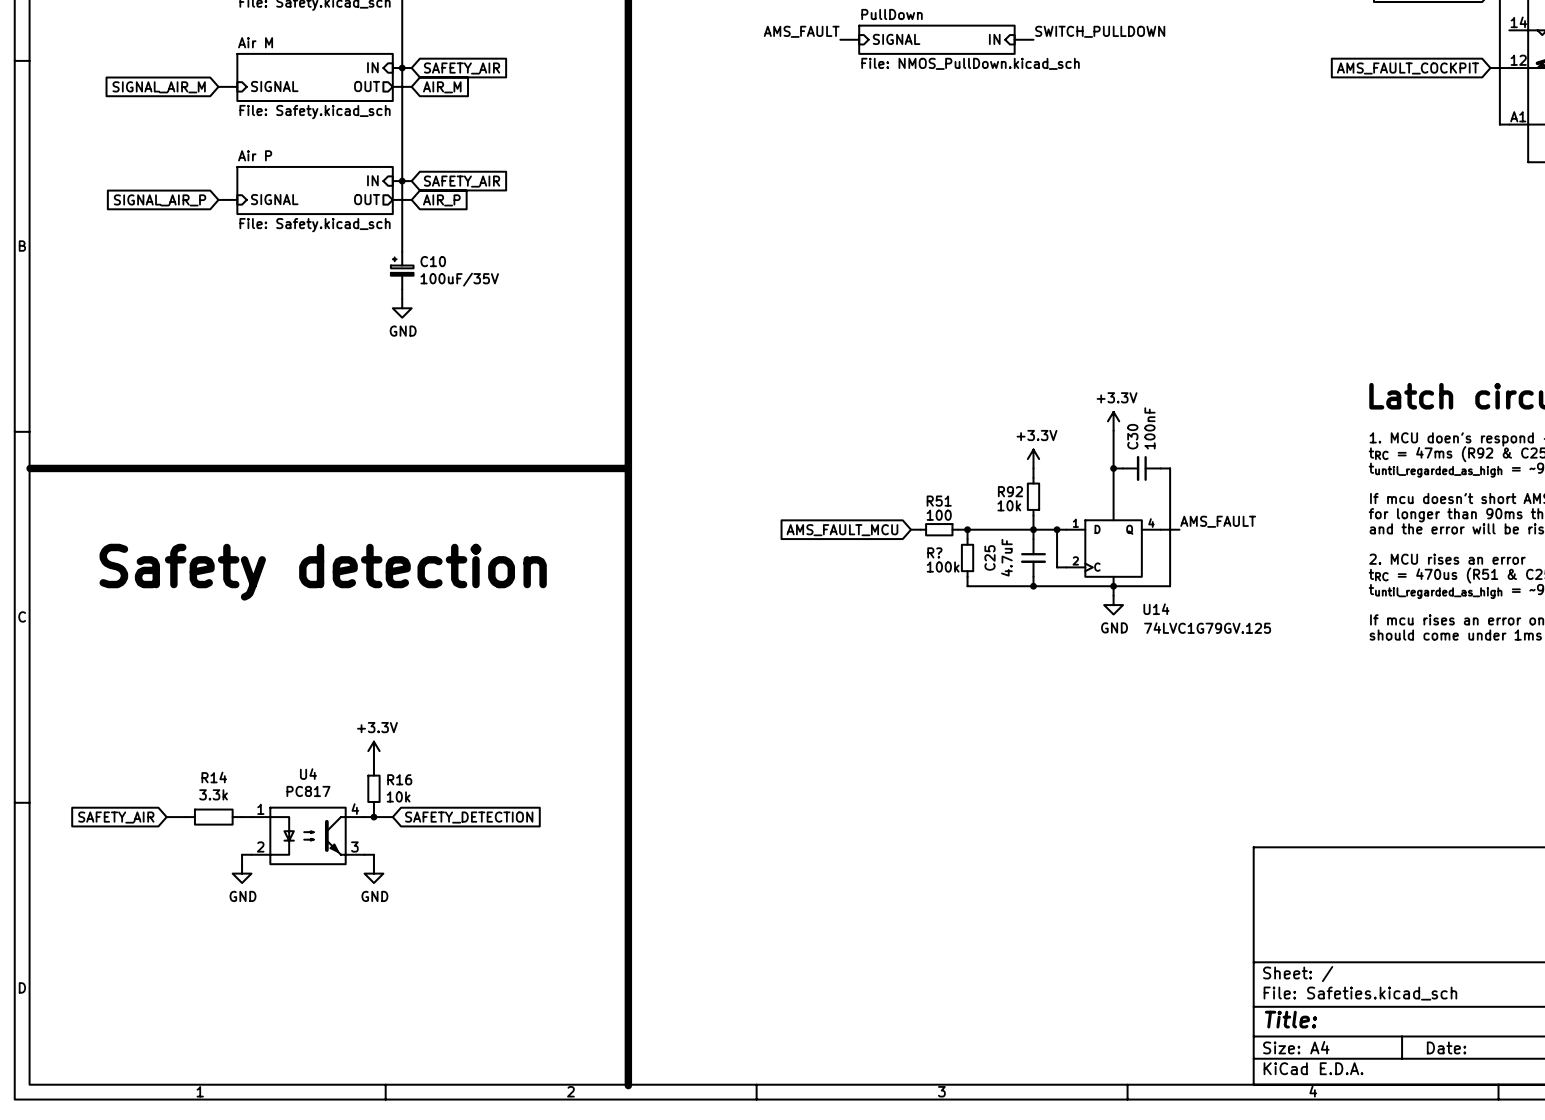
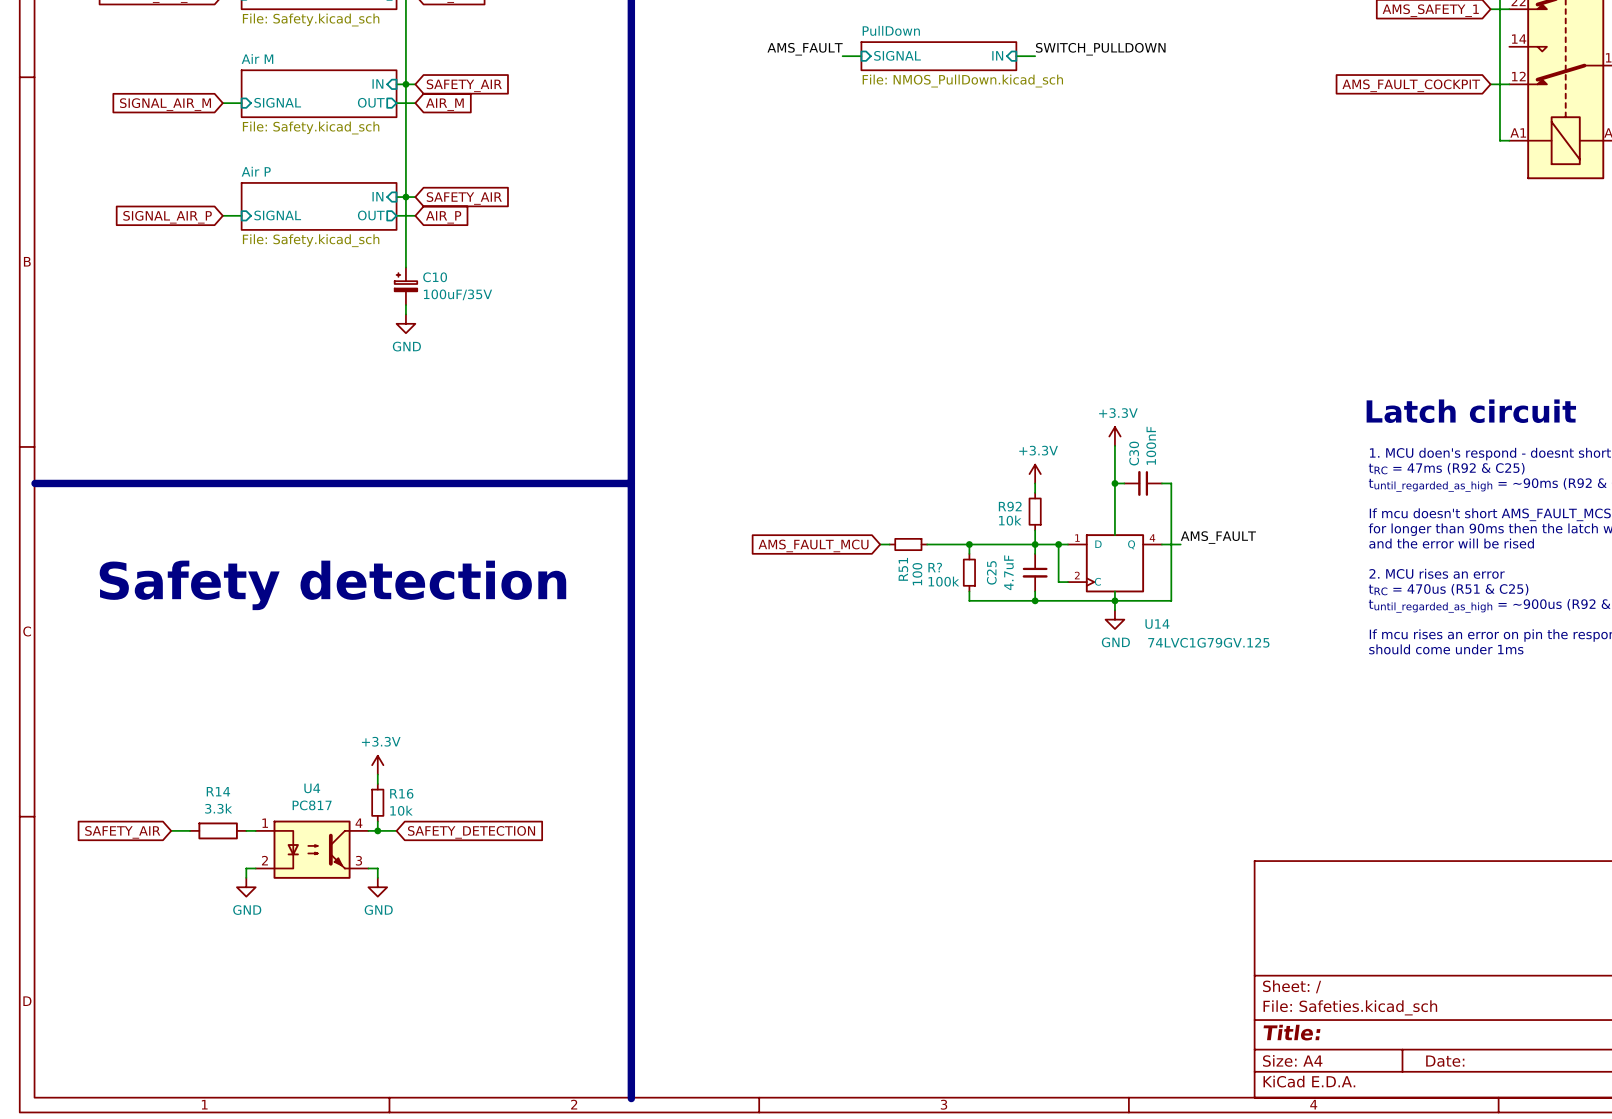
R51 name rotation: 0° (939, 501) -> 90° counterclockwise (903, 569)
R51 name position: R51 (939, 501) -> R51 (903, 569)
R51 value rotation: 0° (939, 515) -> 90° counterclockwise (917, 574)
R51 value position: 100 (939, 515) -> 100 (917, 574)
wire: (911, 529) (920, 529) -> (880, 544) (889, 544)
wire: none -> (927, 544) (960, 544)
R51 position: (939, 529) -> (908, 544)
global label position: AMS_FAULT_MCU (842, 530) -> AMS_FAULT_MCU (813, 545)

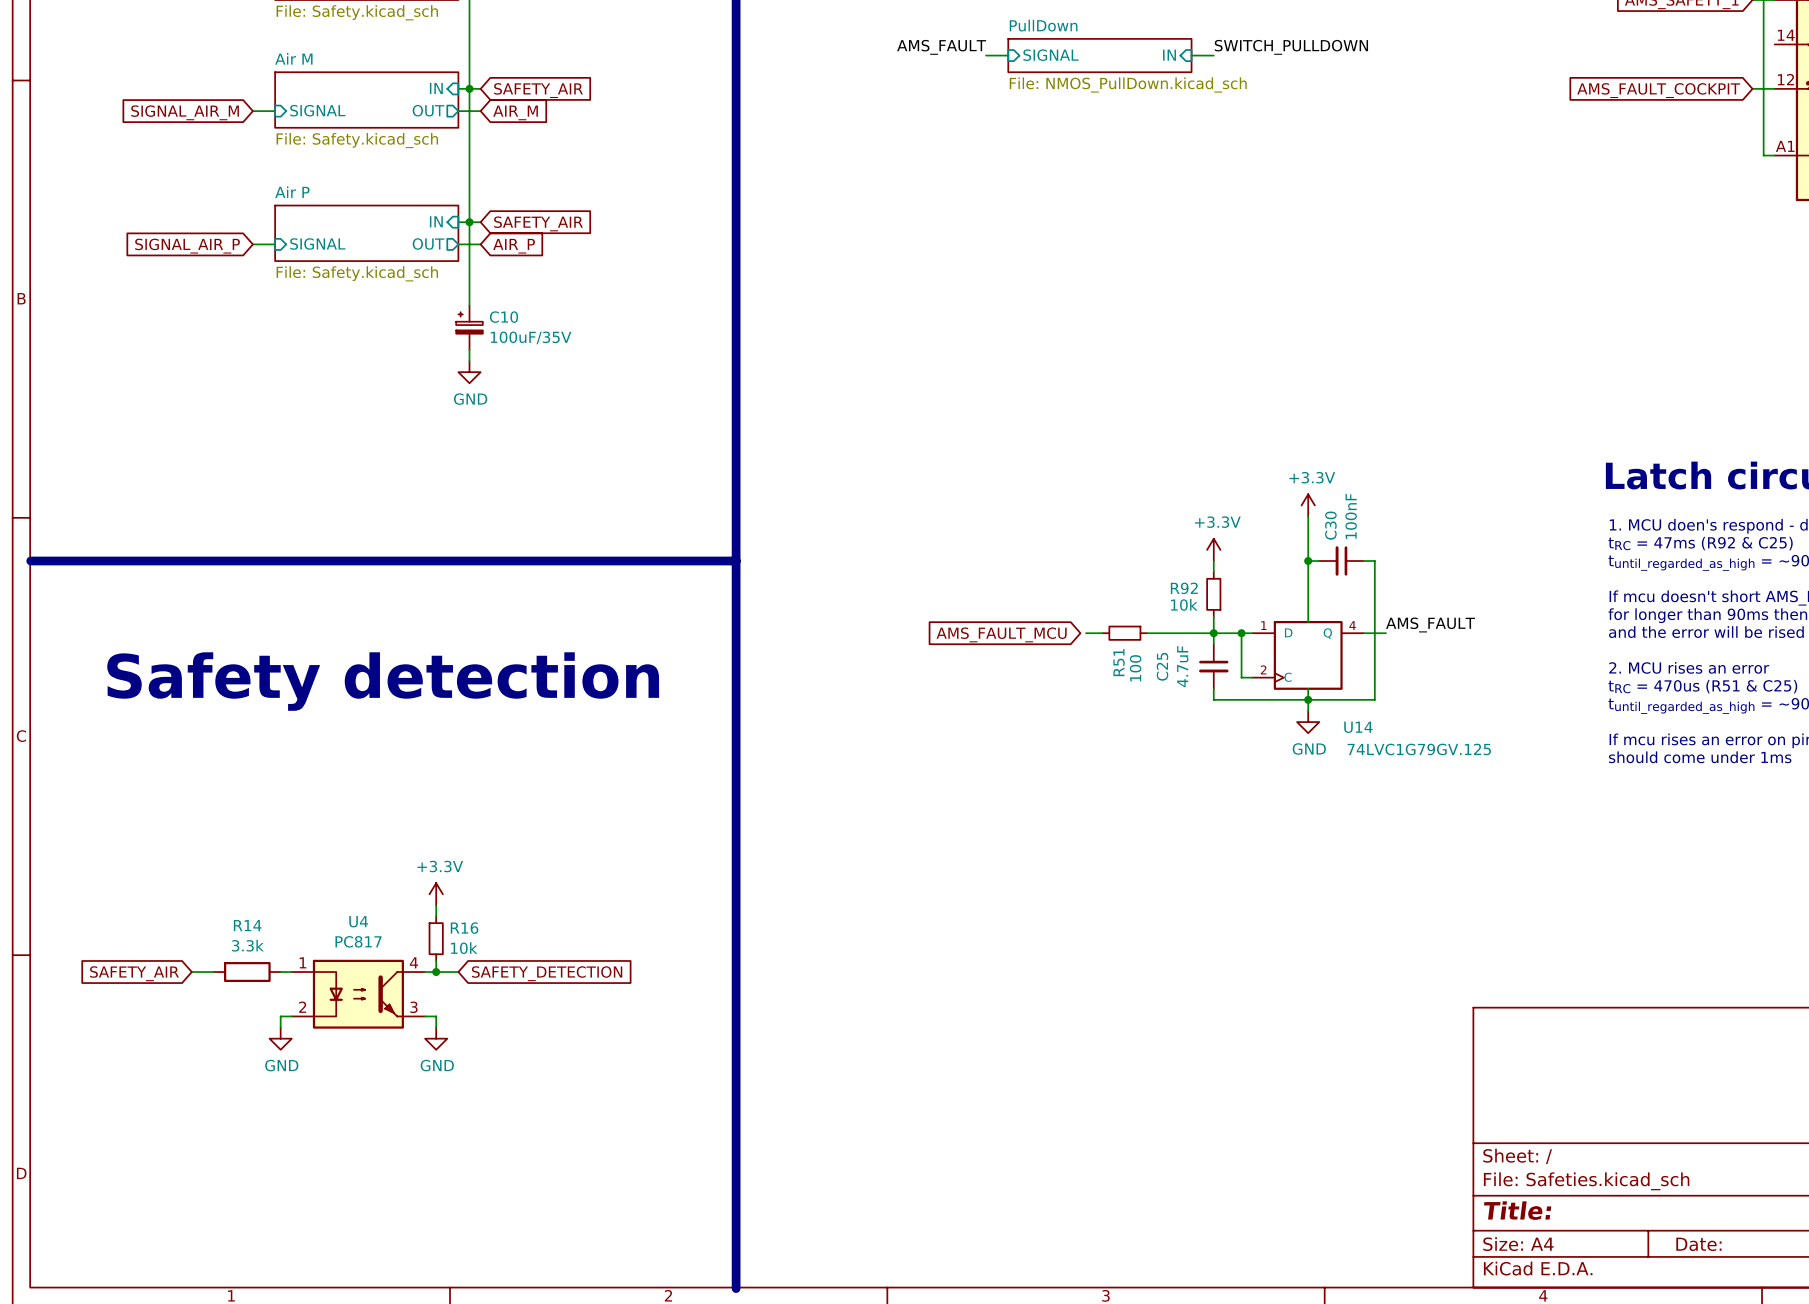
wire: (880, 544) (889, 544) -> none
R51 position: (908, 544) -> (1124, 633)
wire: (941, 544) (978, 544) -> none
wire: (969, 544) (969, 553) -> none
junction: (969, 544) -> none
global label position: AMS_FAULT_MCU (813, 545) -> AMS_FAULT_MCU (1001, 634)
R?: 100k (969, 572) -> none
wire: (969, 591) (969, 600) (1035, 600) -> none
junction: (1035, 600) -> none

